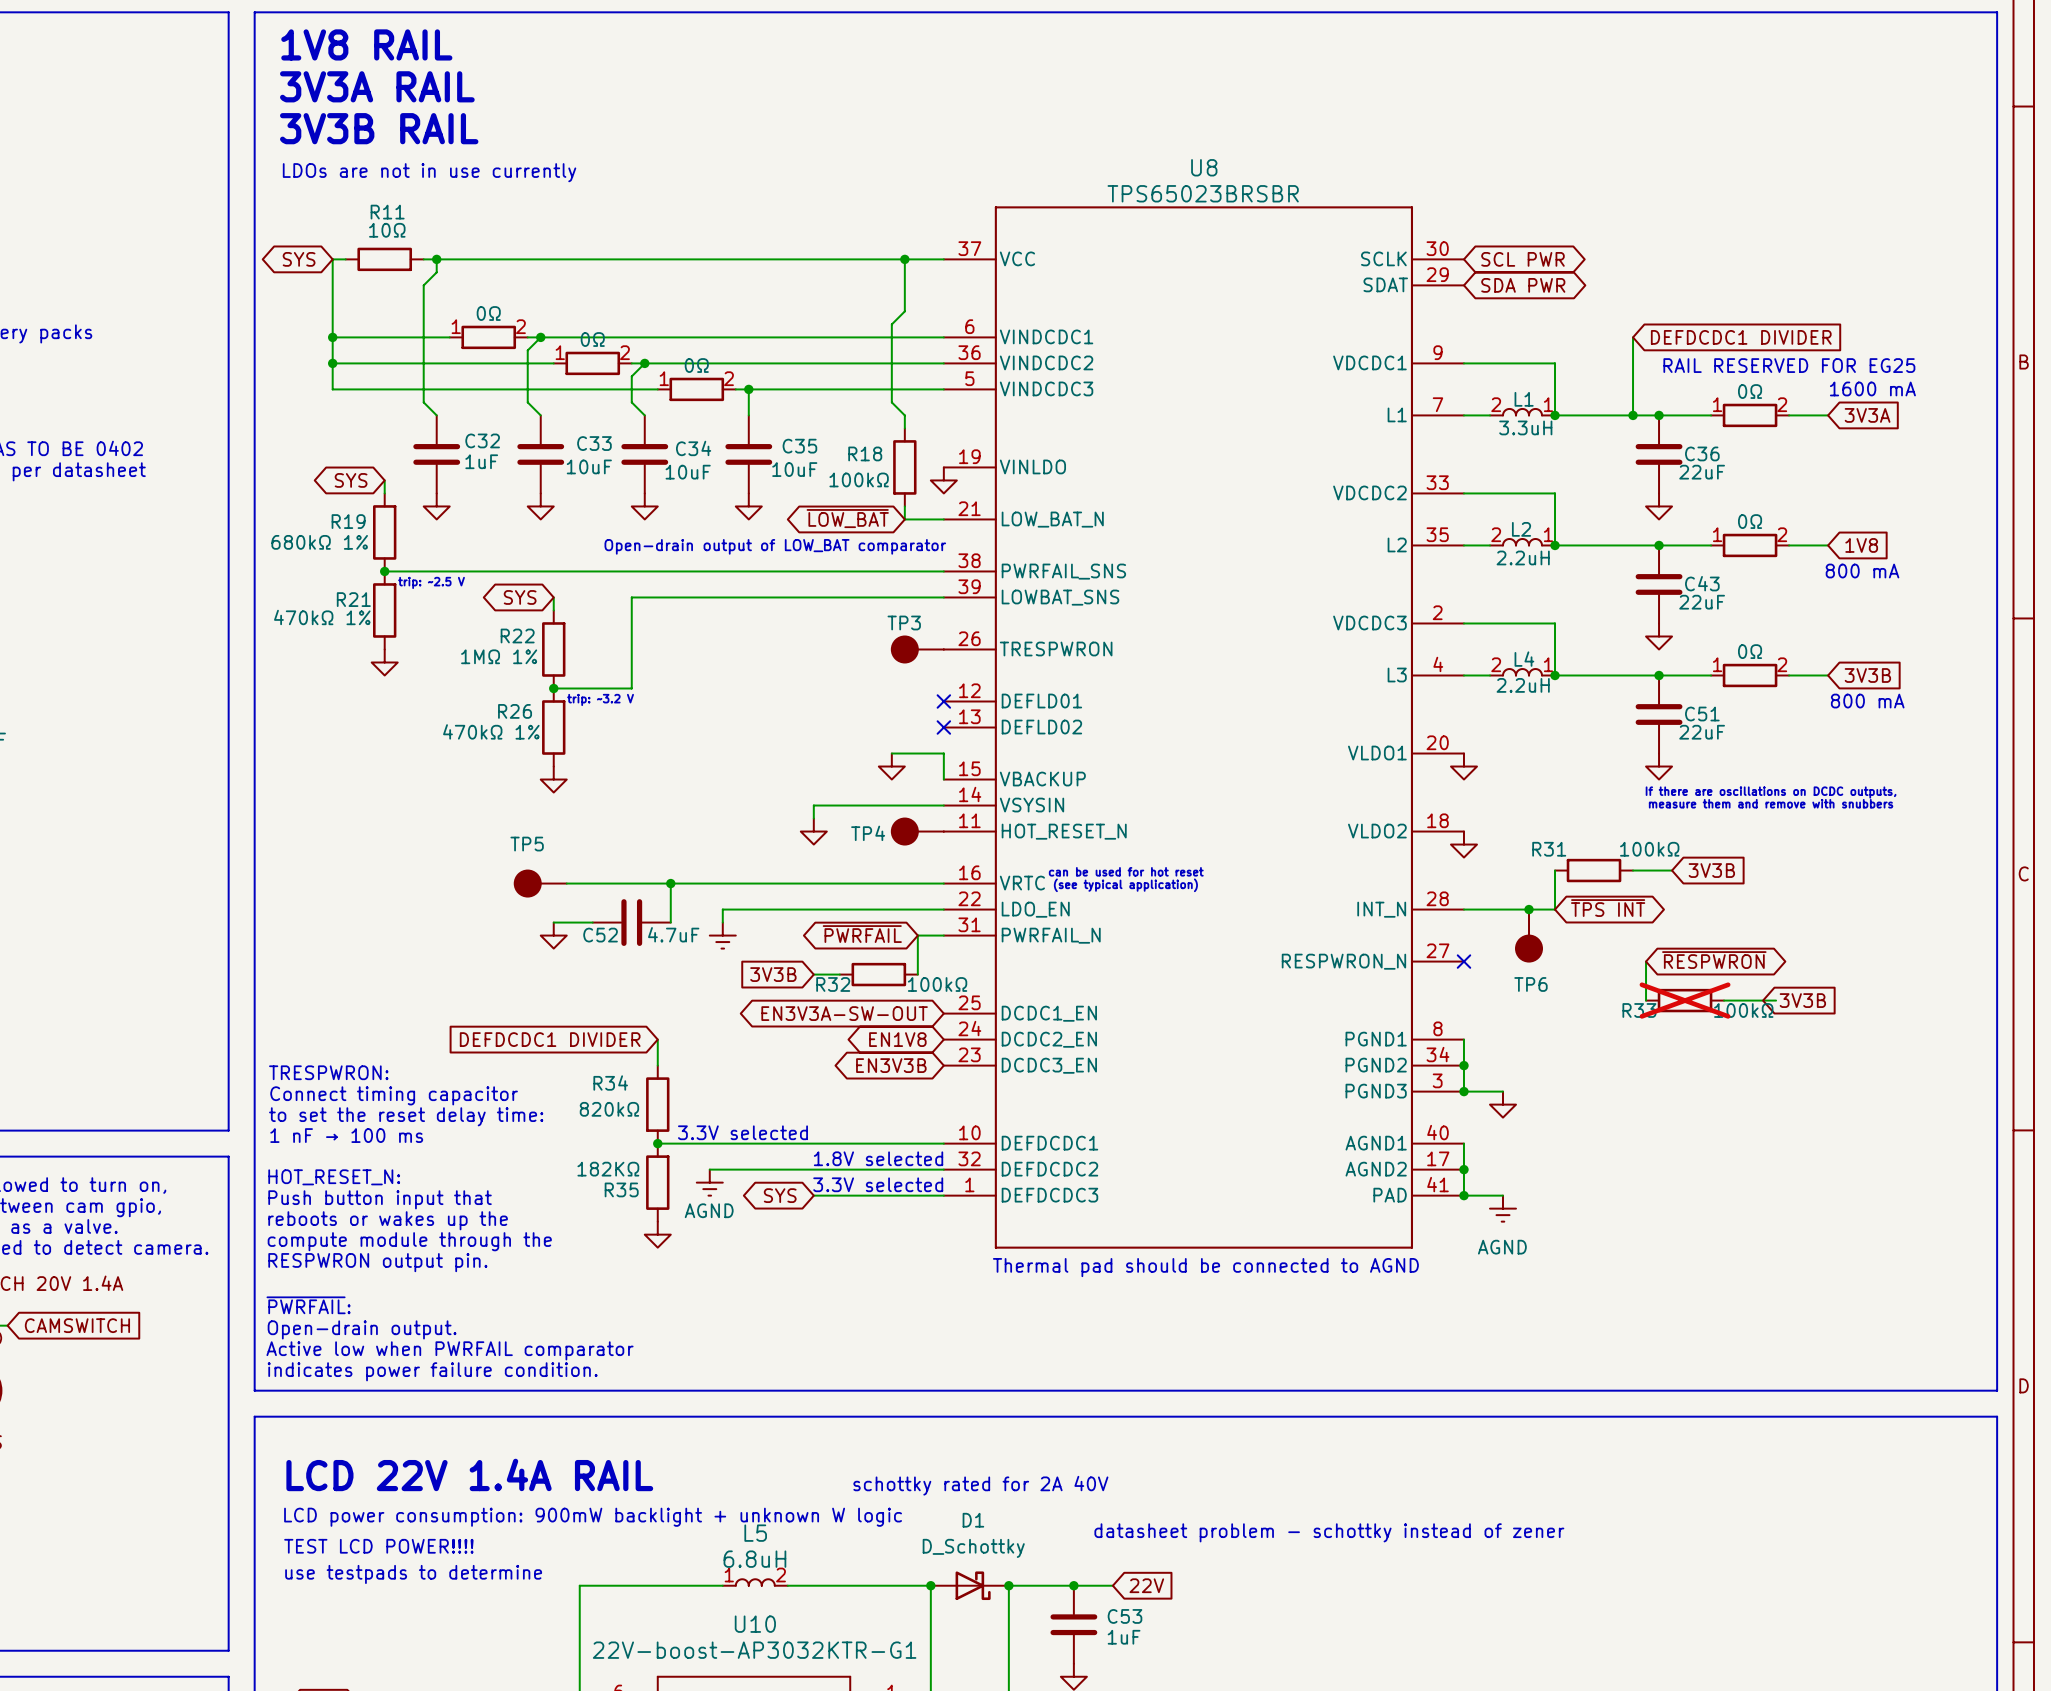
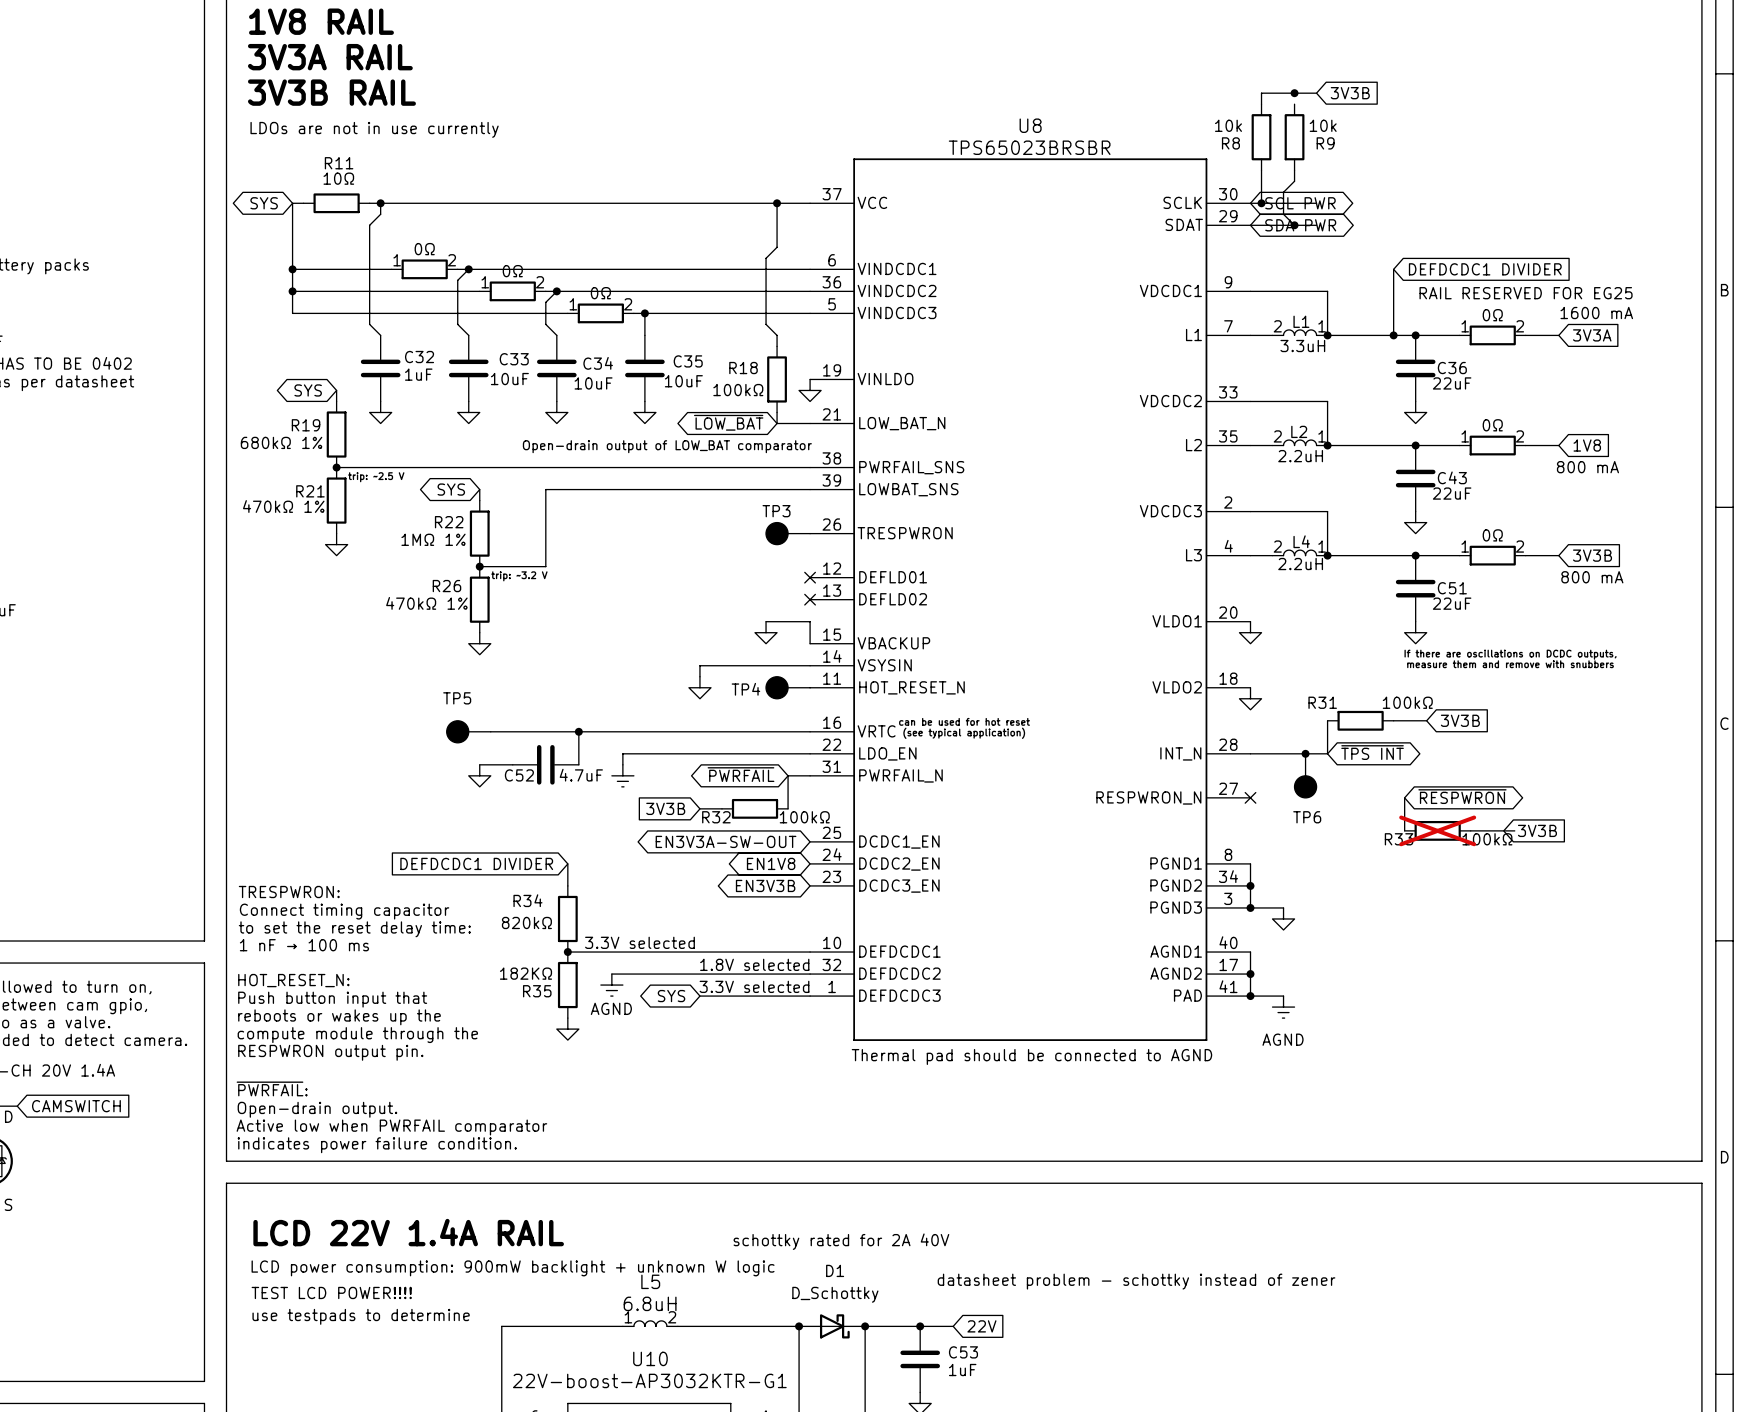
junction: none -> (1294, 93)
wire: none -> (1316, 93) (1261, 93) (1261, 104)
global label: none -> 3V3B (1350, 93)
R8: none -> 10k (1261, 137)
R9: none -> 10k (1294, 137)
wire: none -> (1261, 170) (1261, 203)
wire: none -> (1294, 170) (1294, 181) (1283, 192) (1283, 214) (1294, 225)
wire: none -> (1250, 203) (1316, 203)
junction: none -> (1261, 203)
wire: none -> (1250, 225) (1316, 225)
junction: none -> (1294, 225)

